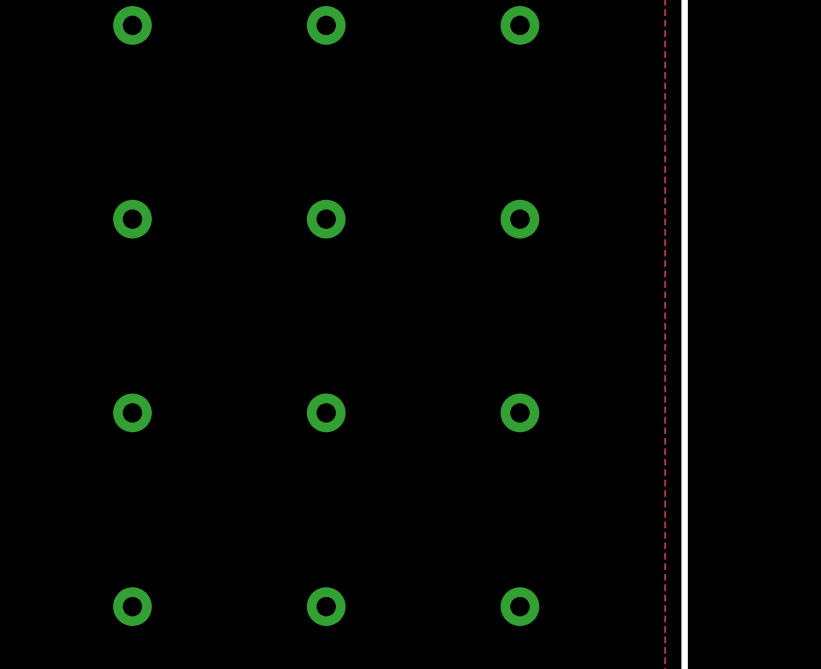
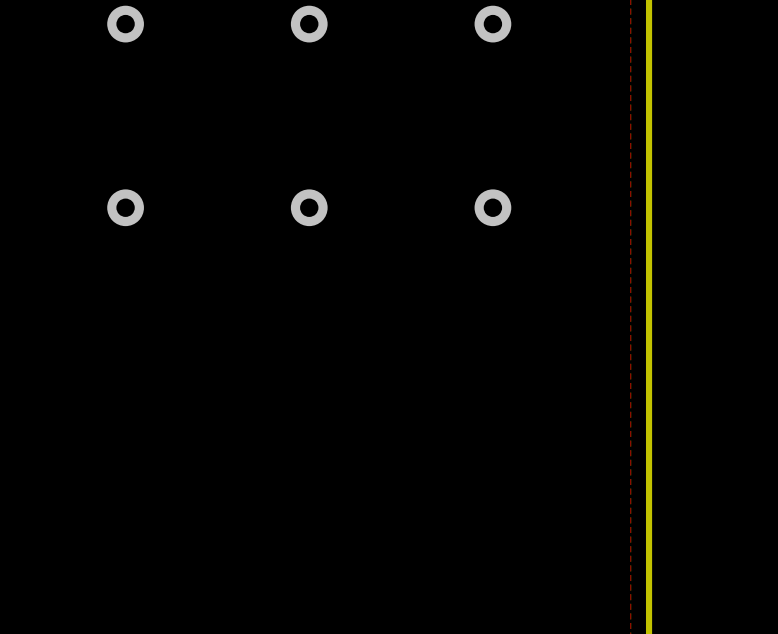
via: (132, 412) -> none
via: (326, 412) -> none
via: (519, 412) -> none
via: (132, 606) -> none
via: (326, 606) -> none
via: (519, 606) -> none

